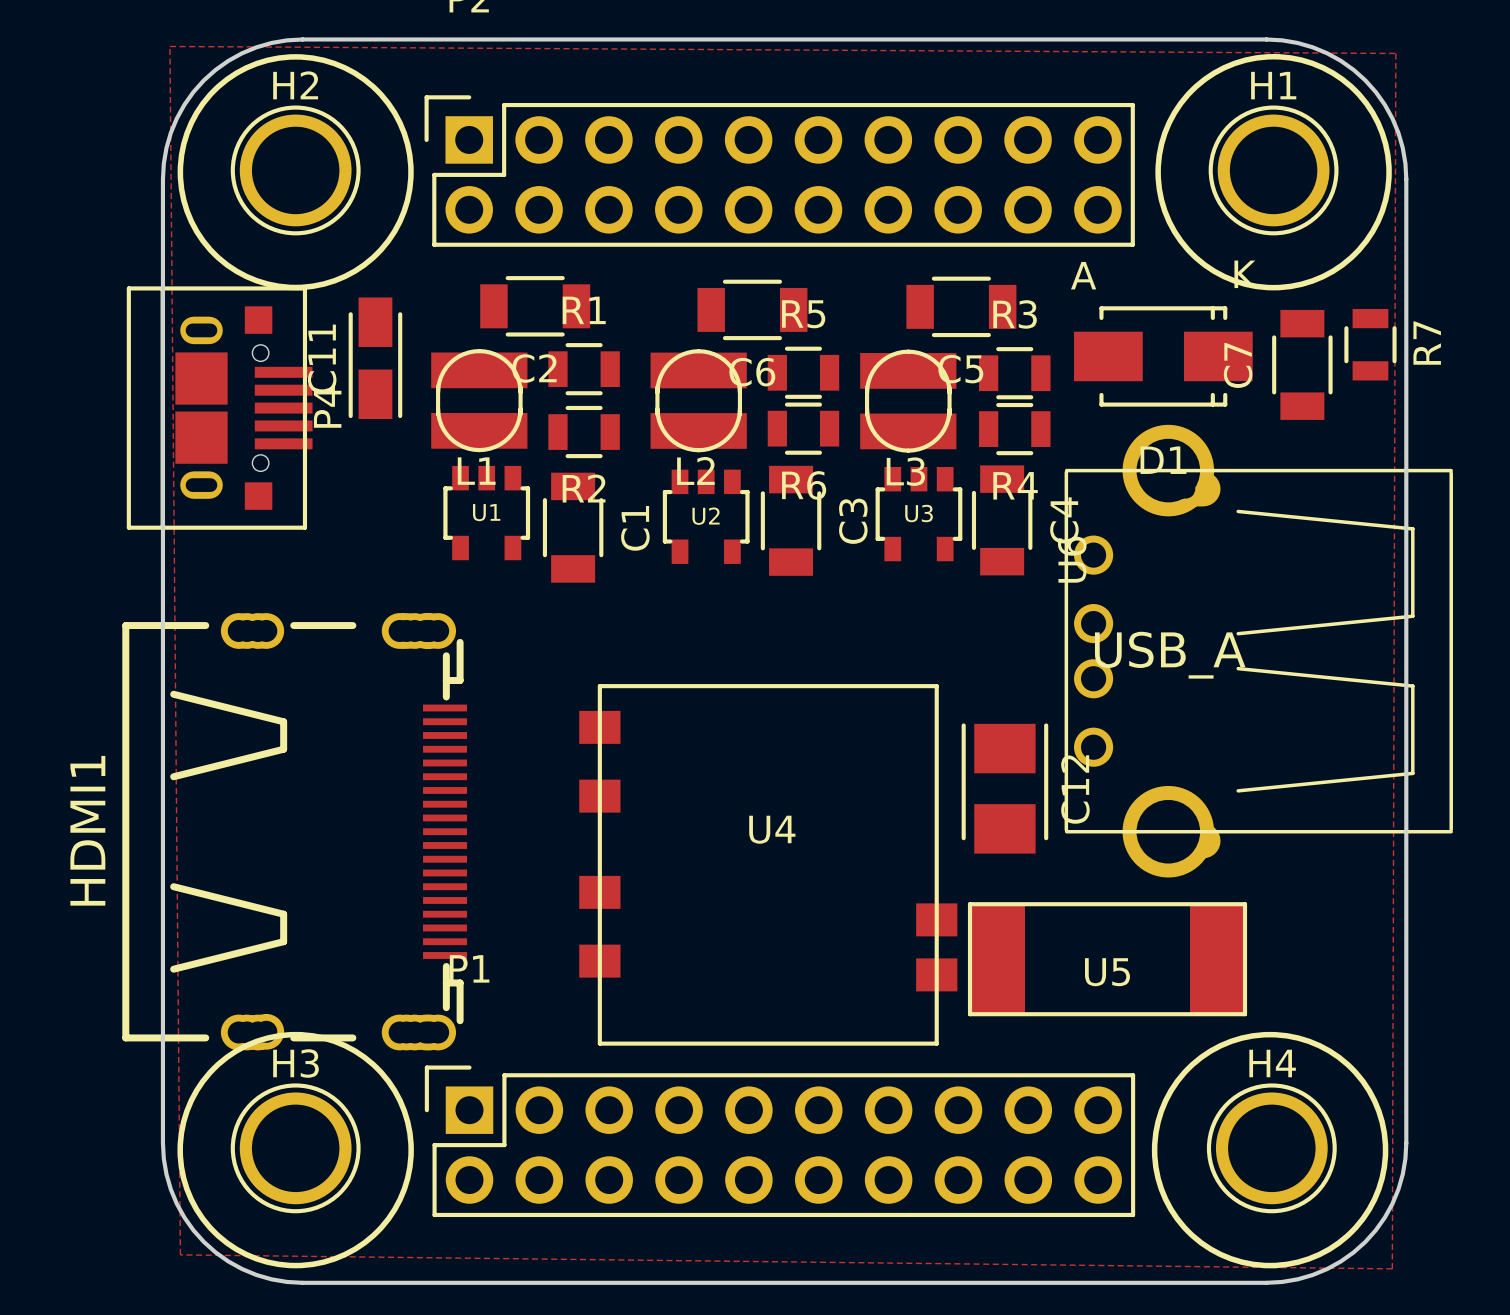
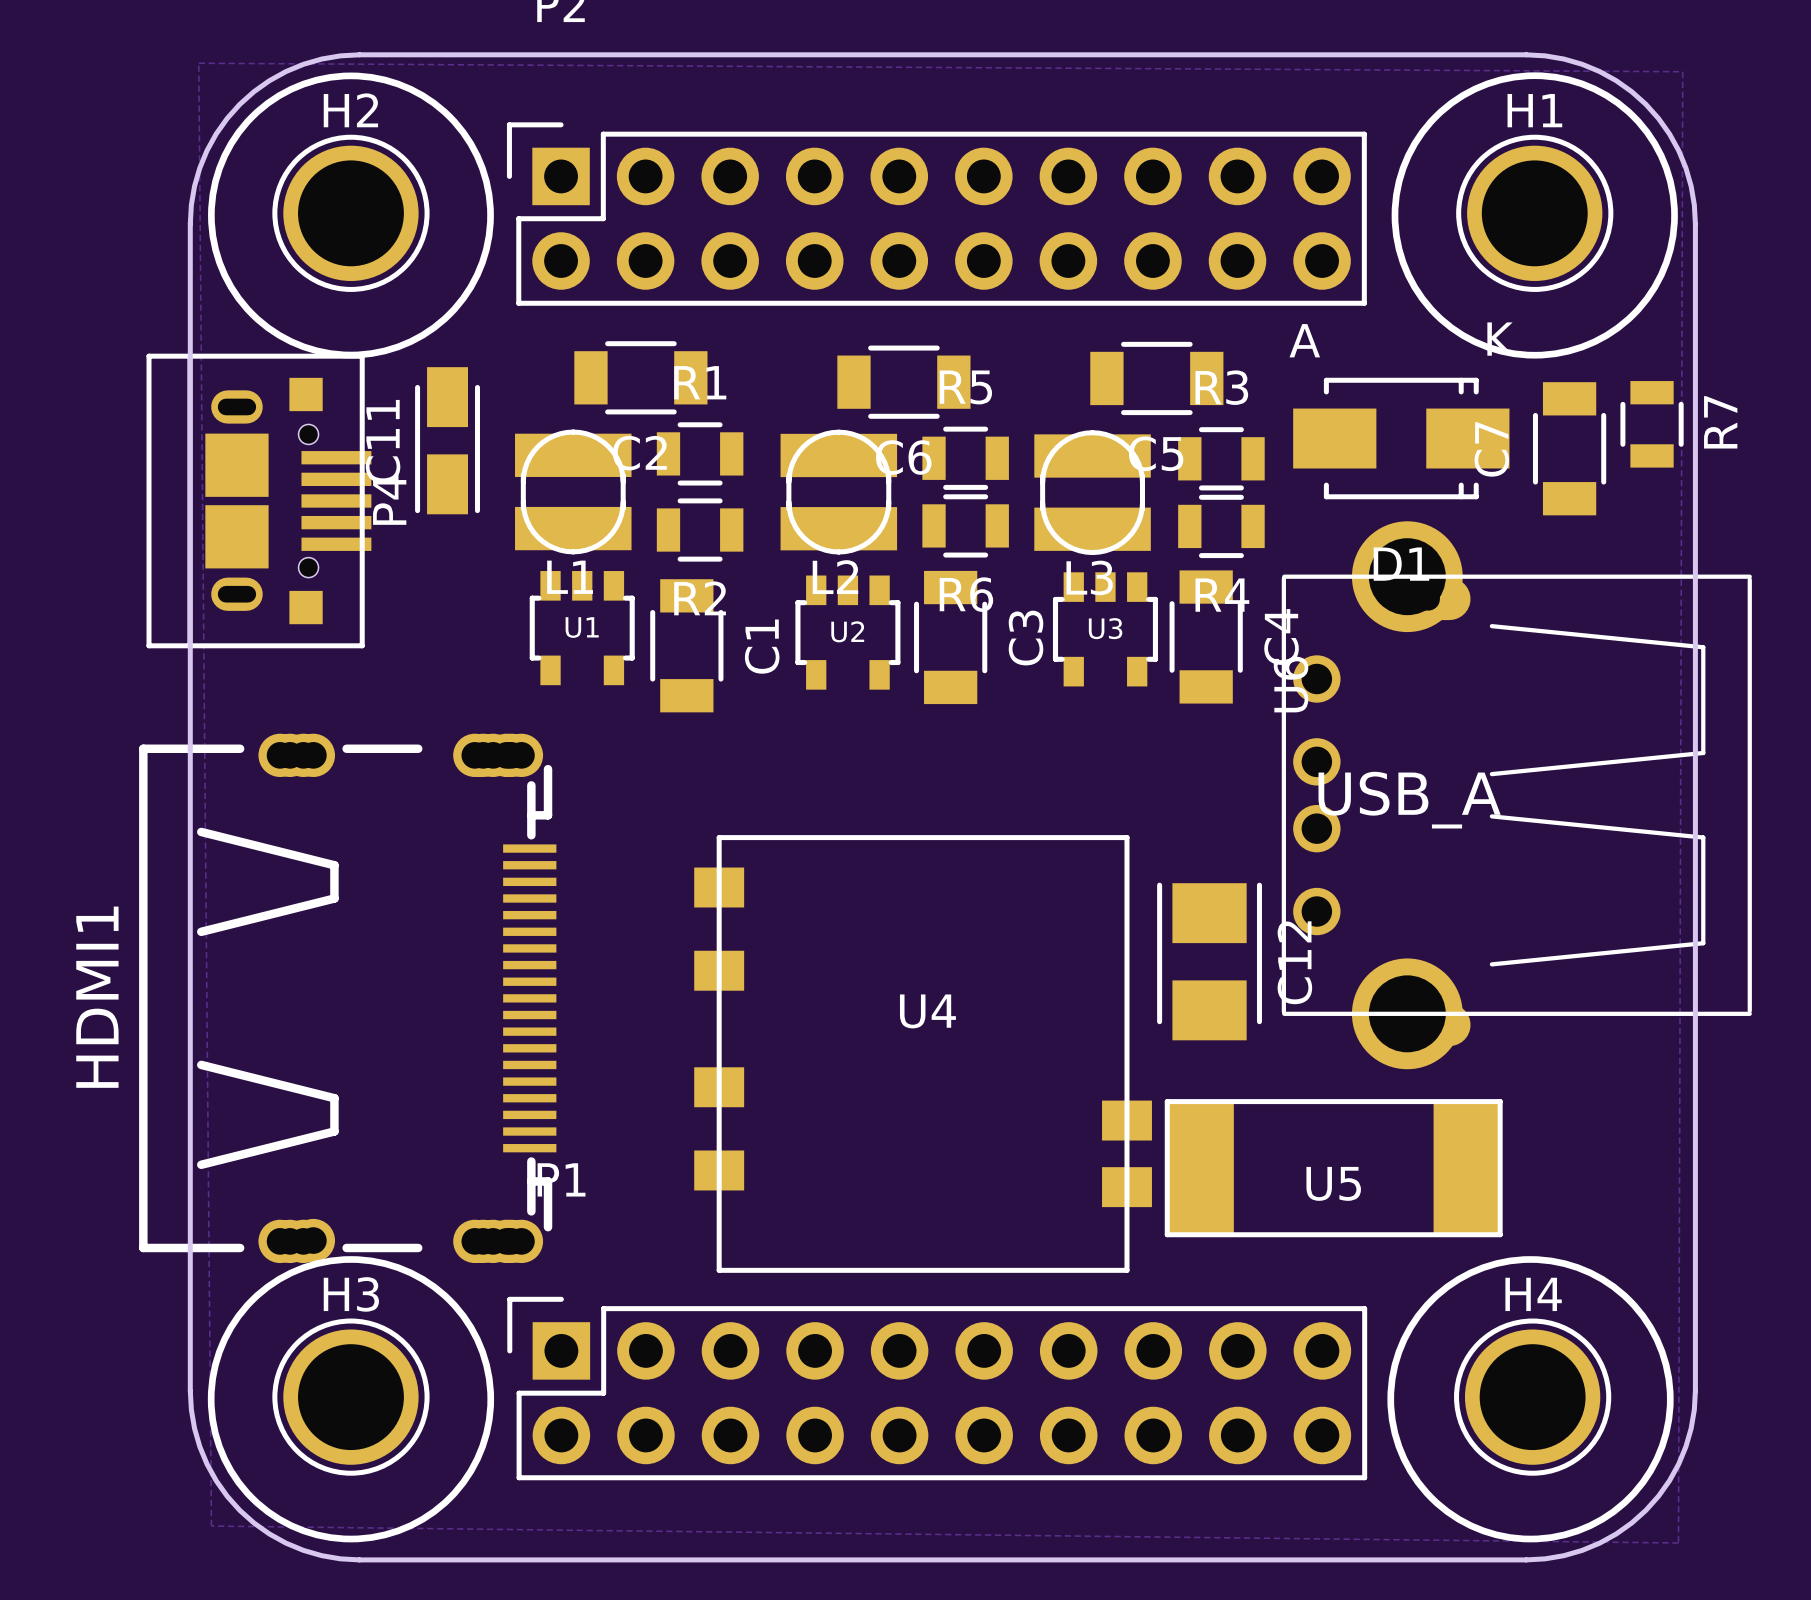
HDMI1 position: (294, 831) -> (347, 998)

